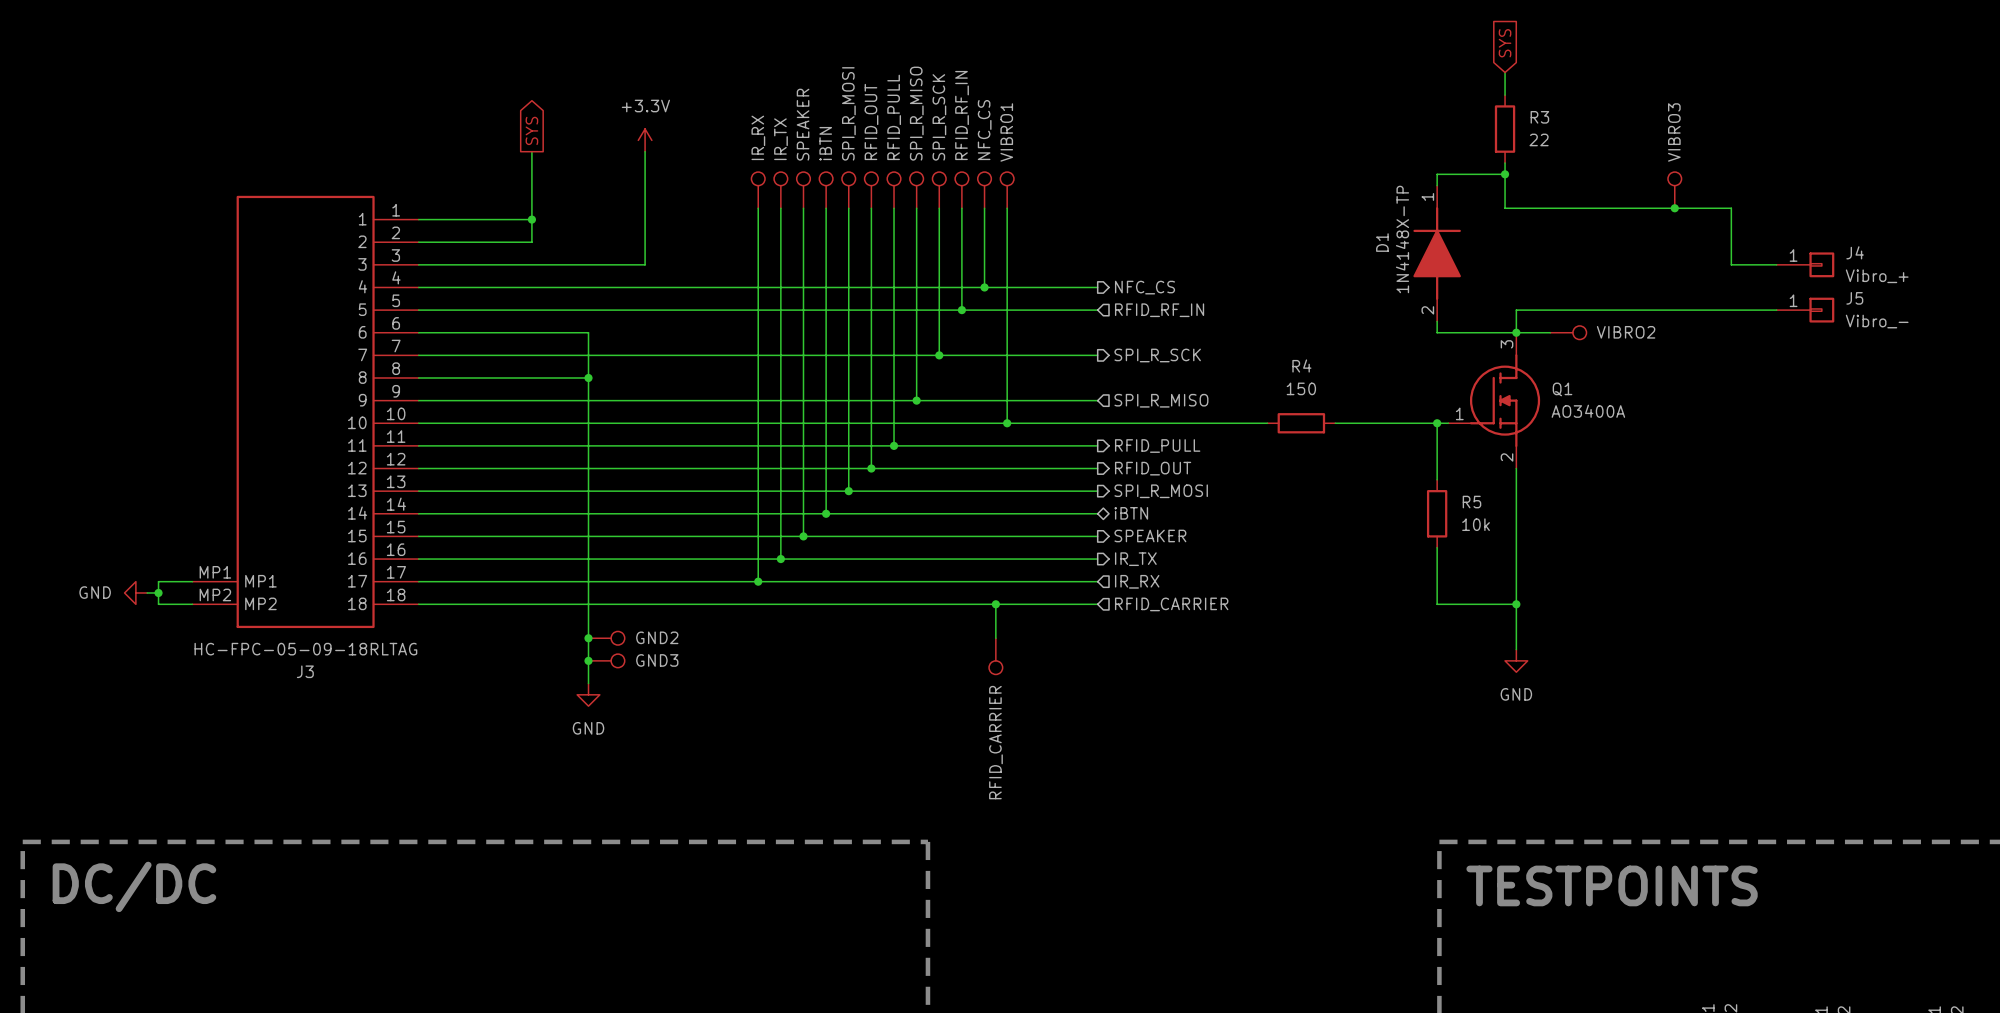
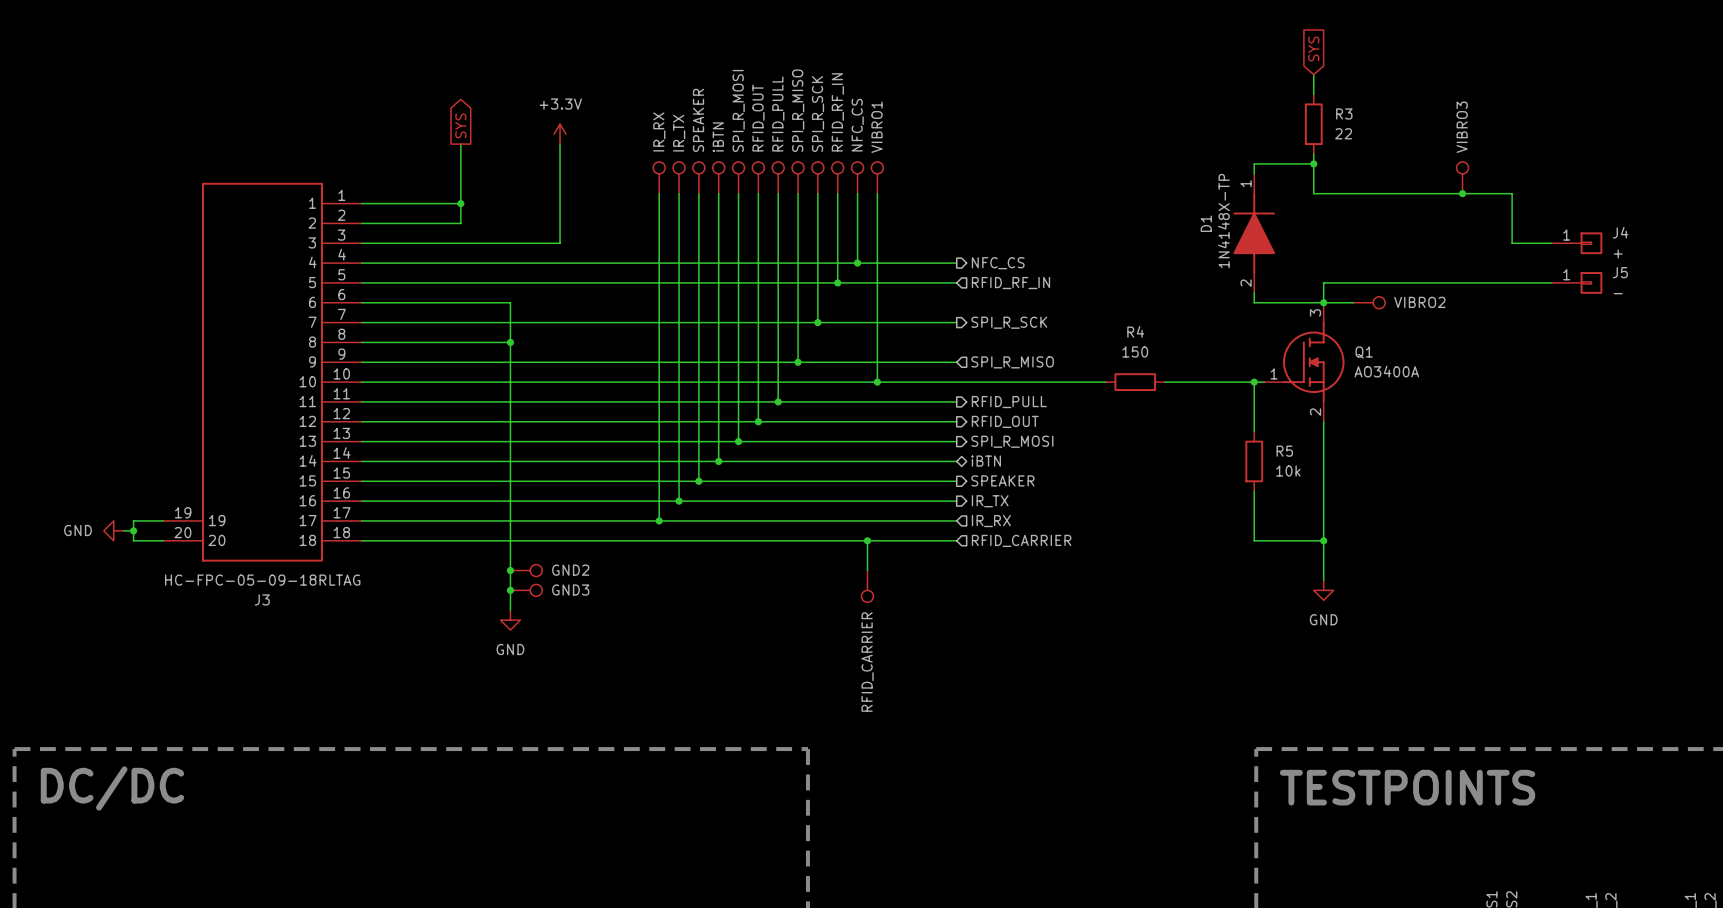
J4 value: Vibro_+ (1877, 276) -> + (1618, 253)
J5 value: Vibro_- (1877, 321) -> - (1618, 293)
J3 pin number: MP1 (215, 572) -> 19 (183, 512)
J3 pin name: MP1 (260, 581) -> 19 (217, 520)
J3 pin number: MP2 (215, 594) -> 20 (182, 532)
J3 pin name: MP2 (260, 603) -> 20 (216, 540)

